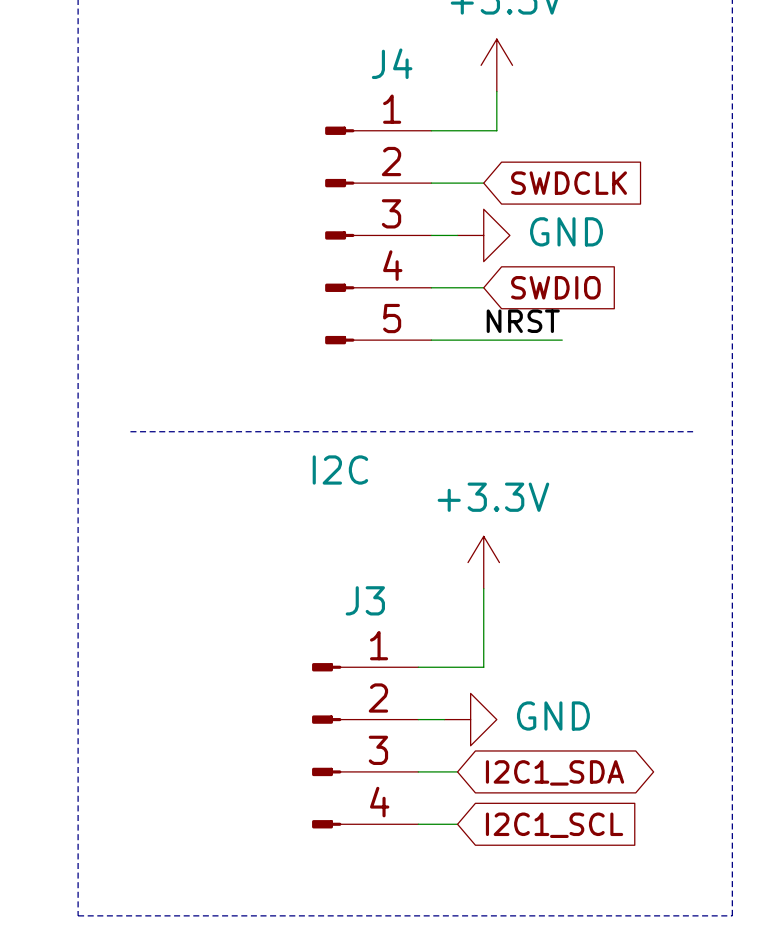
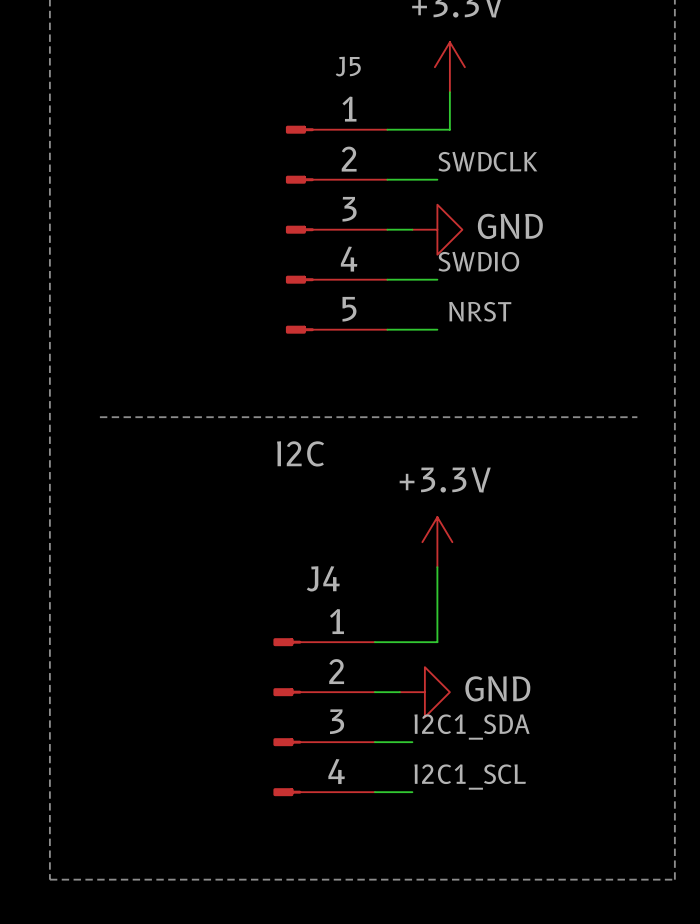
J4 name: J4 (392, 63) -> J5 (348, 66)
label: none -> SWDCLK (487, 161)
global label: SWDCLK (569, 183) -> none
label: none -> SWDIO (478, 261)
global label: SWDIO (555, 287) -> none
wire: (483, 340) (562, 340) -> none
J3 name: J3 (365, 600) -> J4 (323, 578)
label: none -> I2C1_SDA (472, 727)
global label: I2C1_SDA (555, 772) -> none
label: none -> I2C1_SCL (470, 777)
global label: I2C1_SCL (554, 825) -> none

